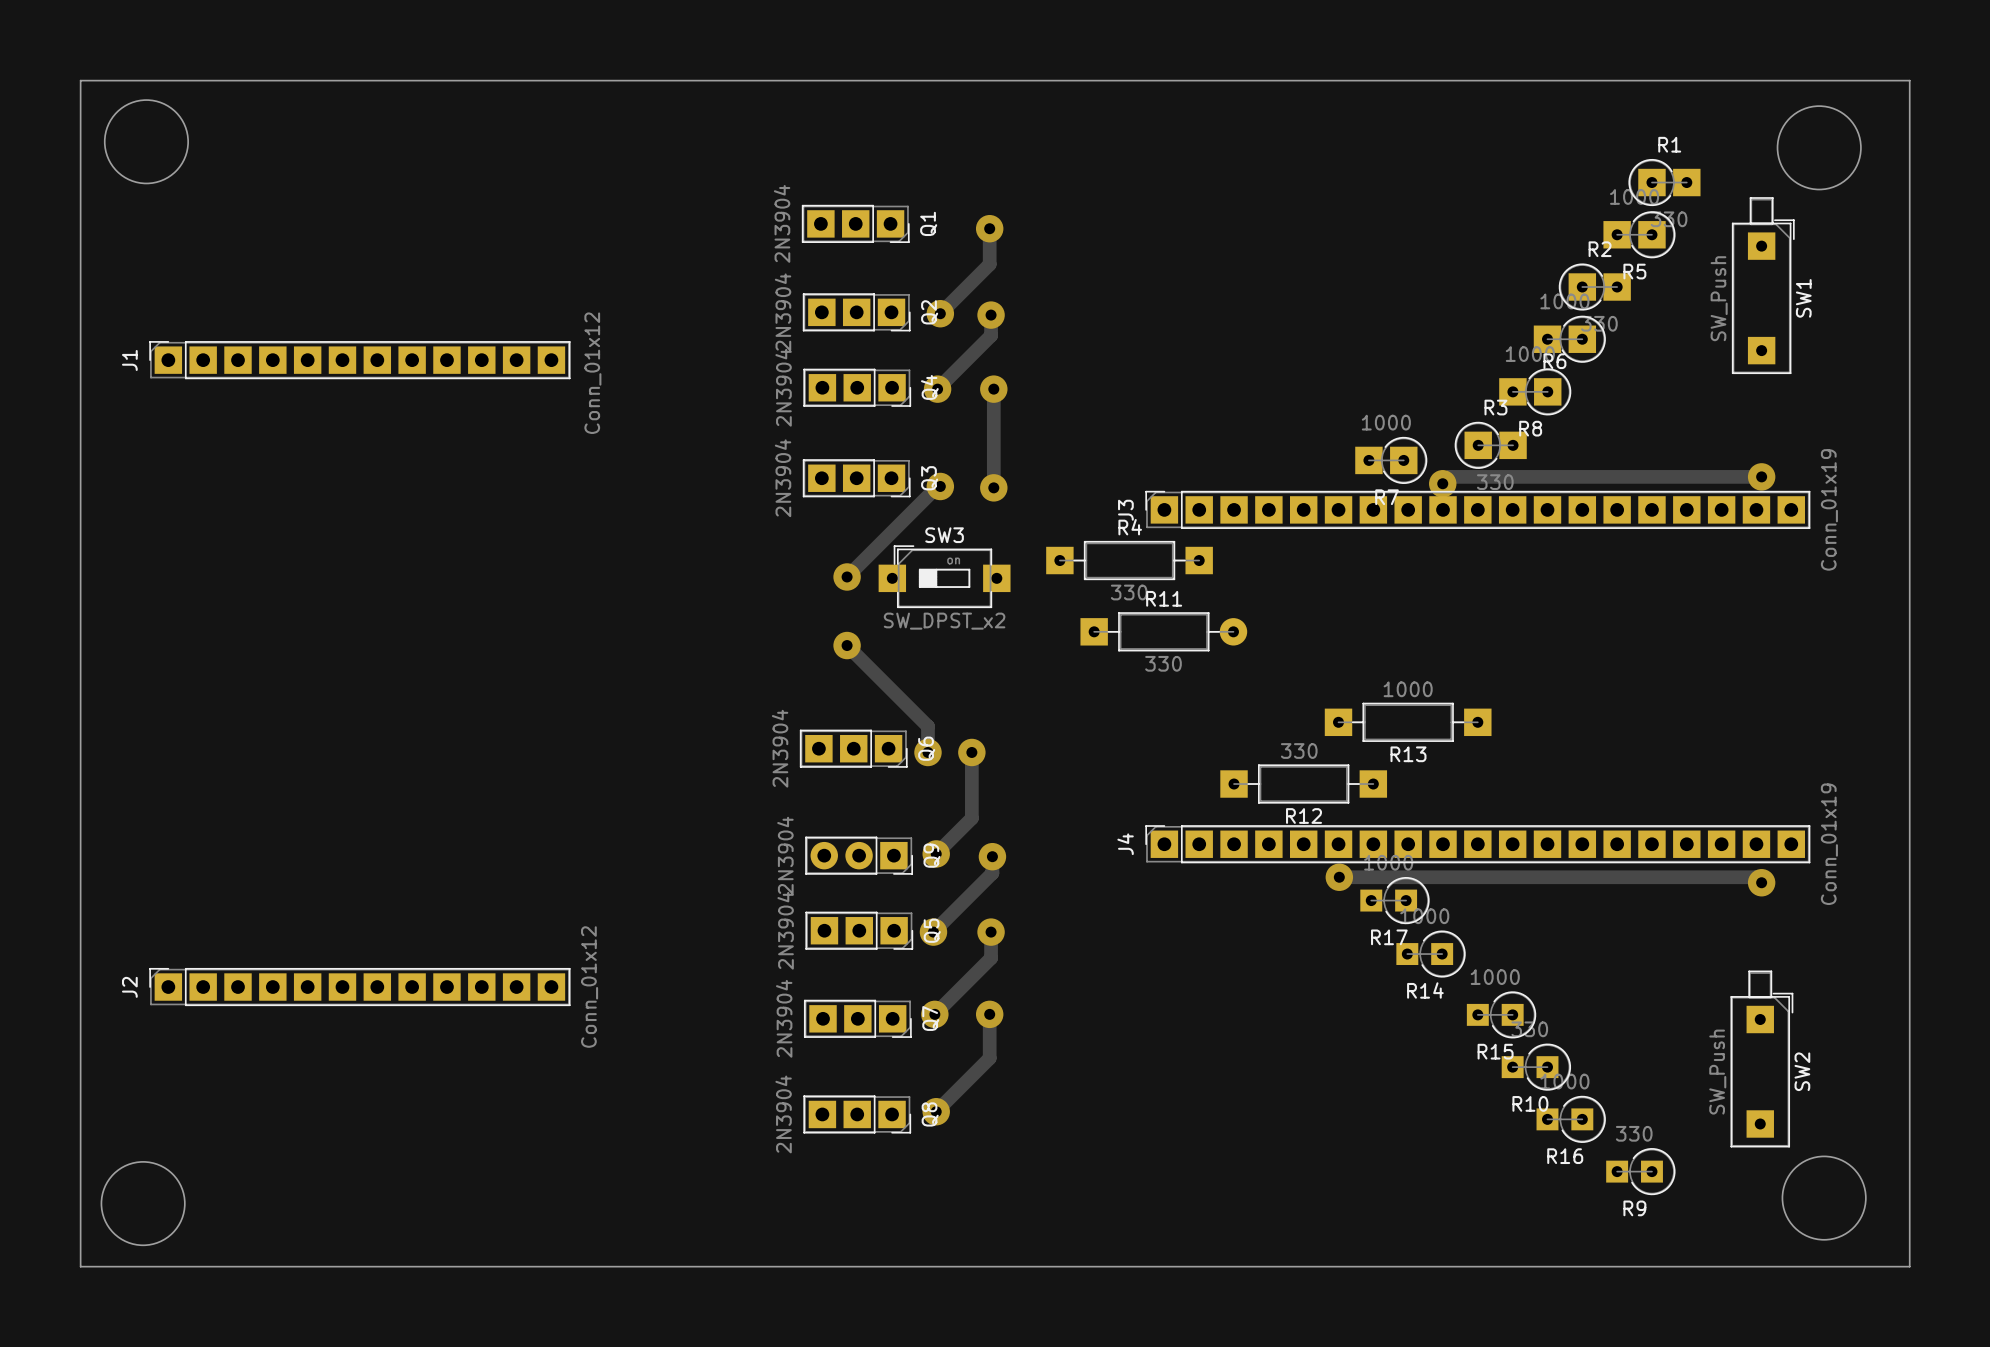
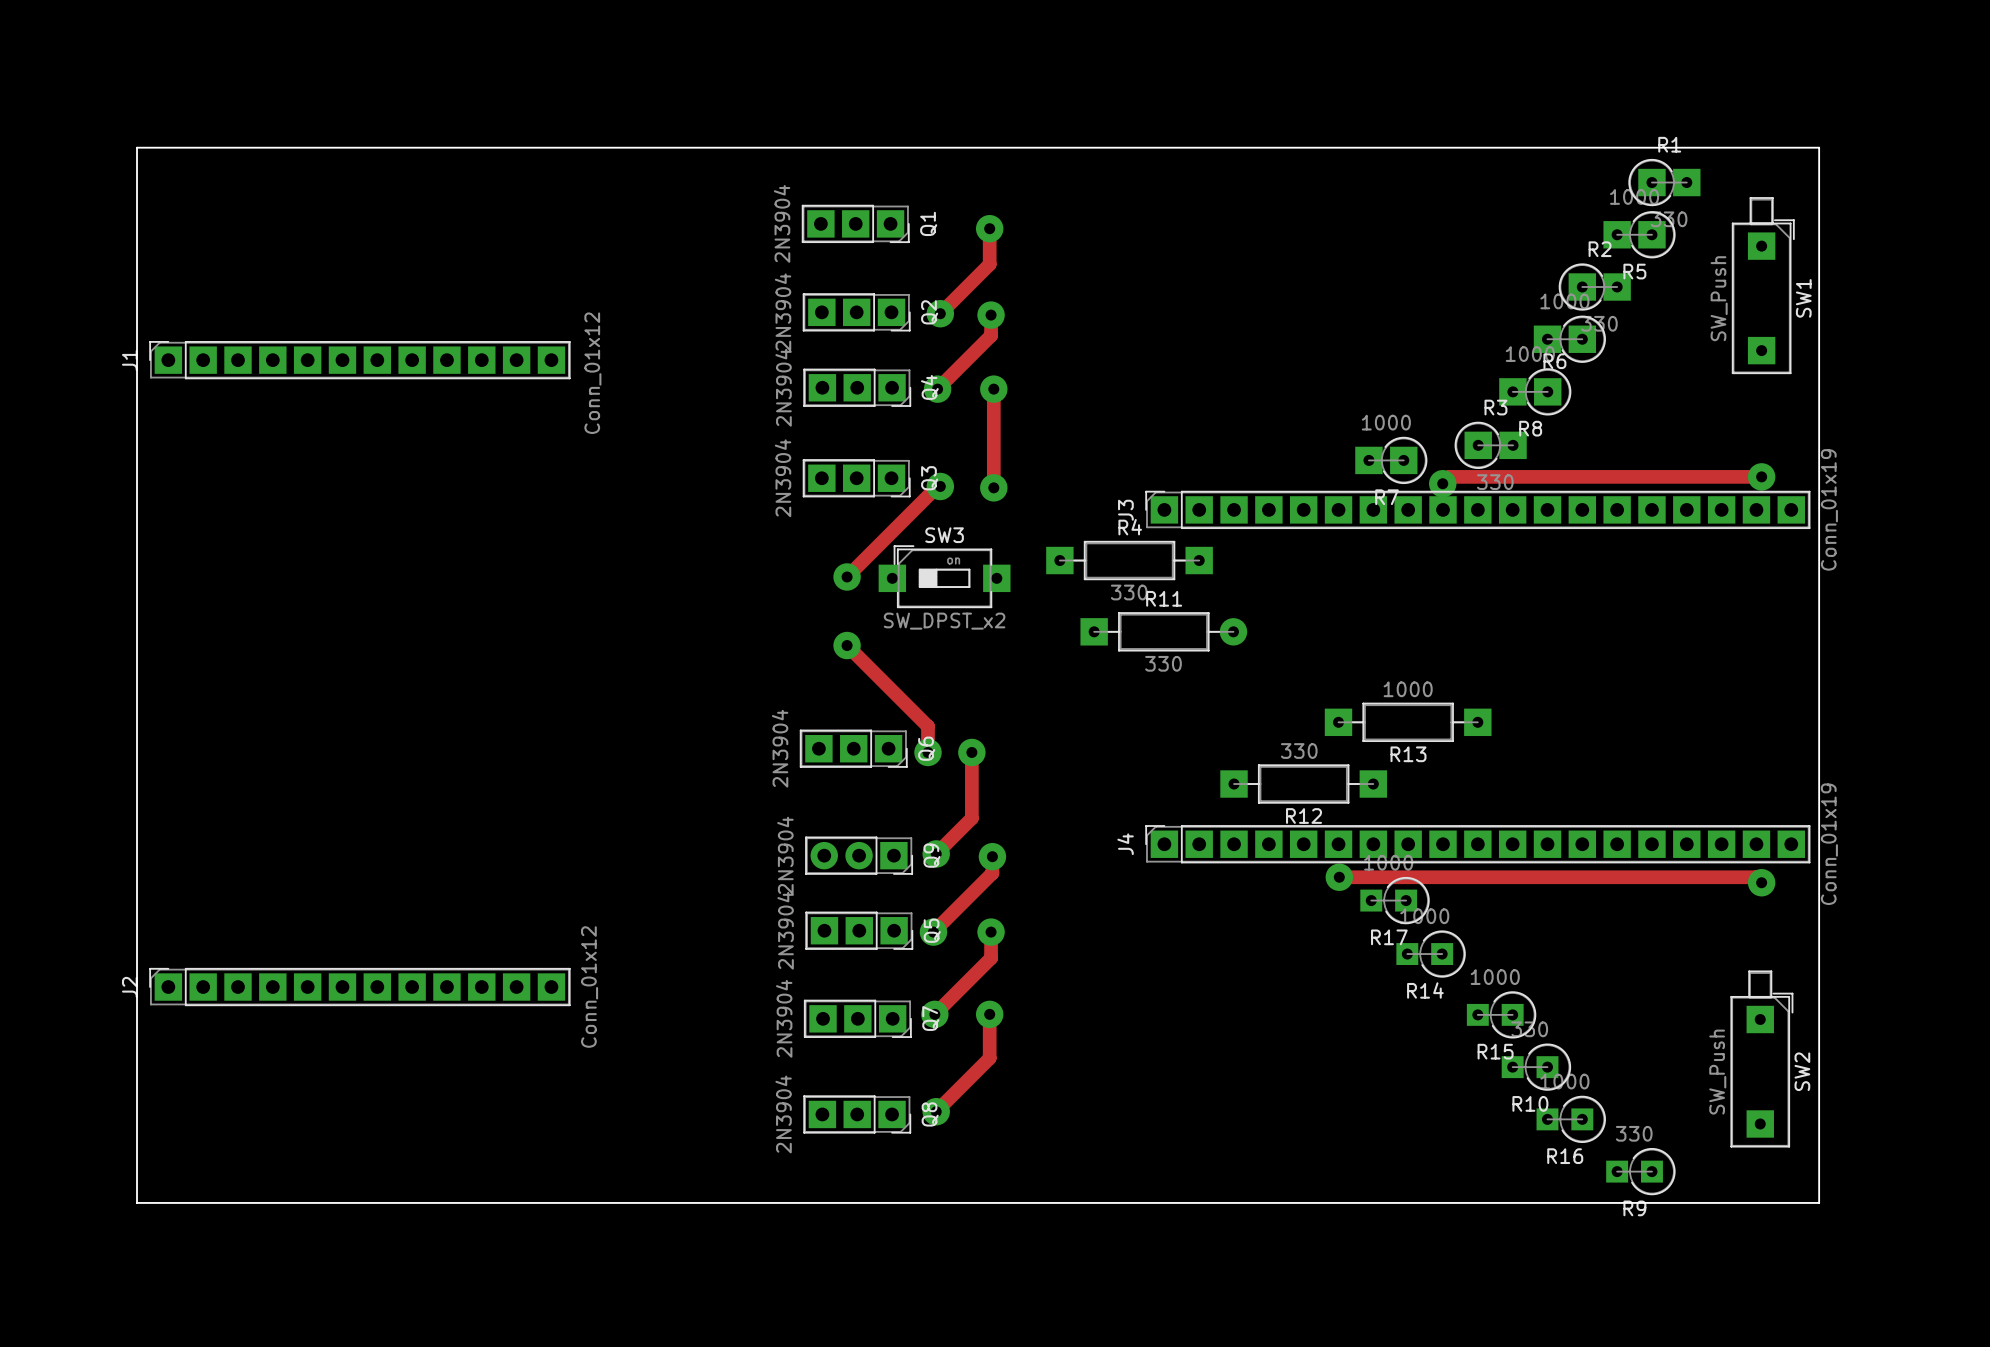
board edge: (80, 80) (1909, 80) (1909, 1266) (80, 1266) (80, 80) -> (137, 147) (137, 1202) (1819, 1202) (1819, 147) (137, 147)
round board edge: [104, 99, 189, 185] -> none
round board edge: [1776, 105, 1862, 191] -> none
round board edge: [1781, 1155, 1867, 1241] -> none
round board edge: [100, 1161, 186, 1246] -> none

